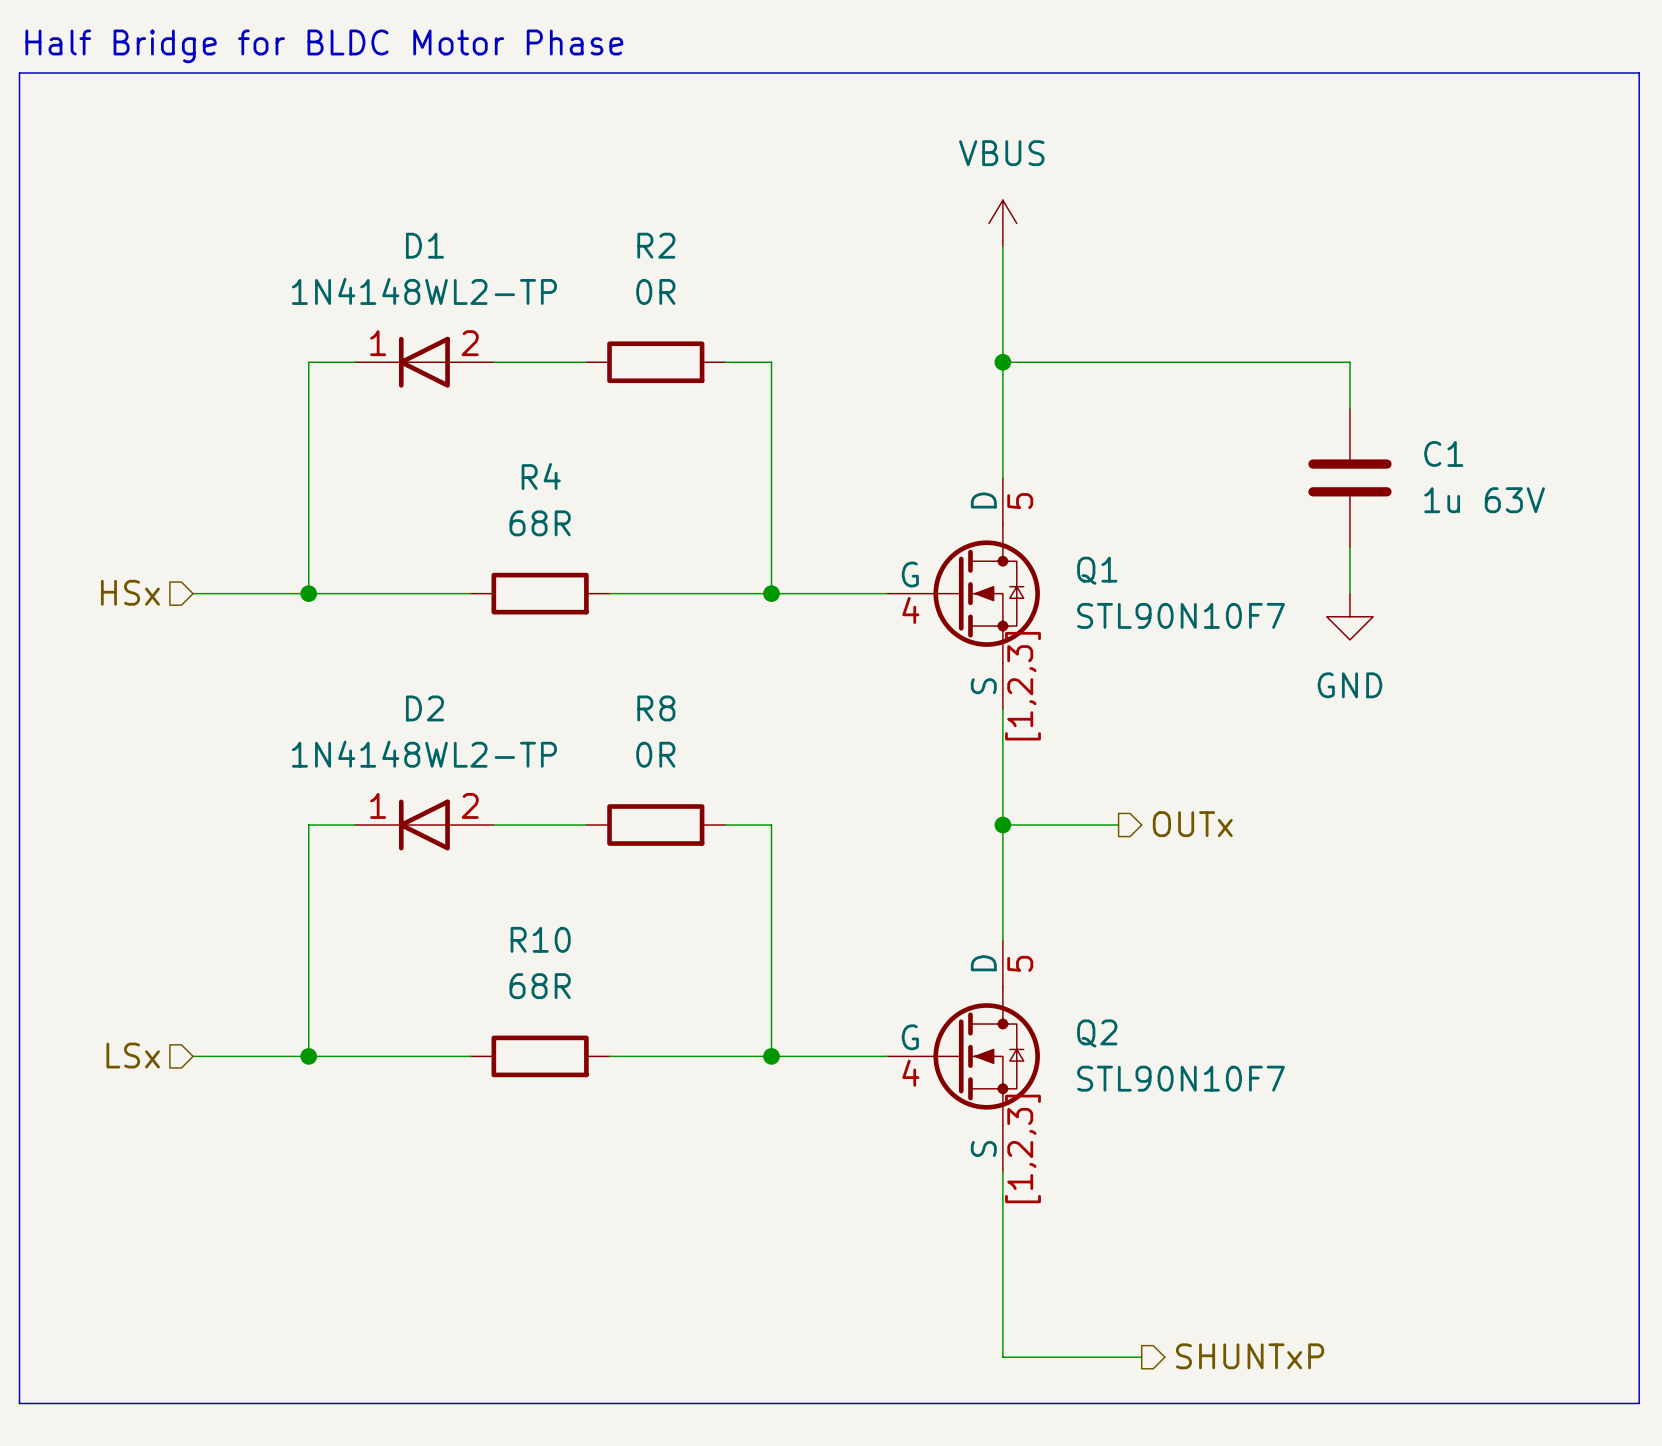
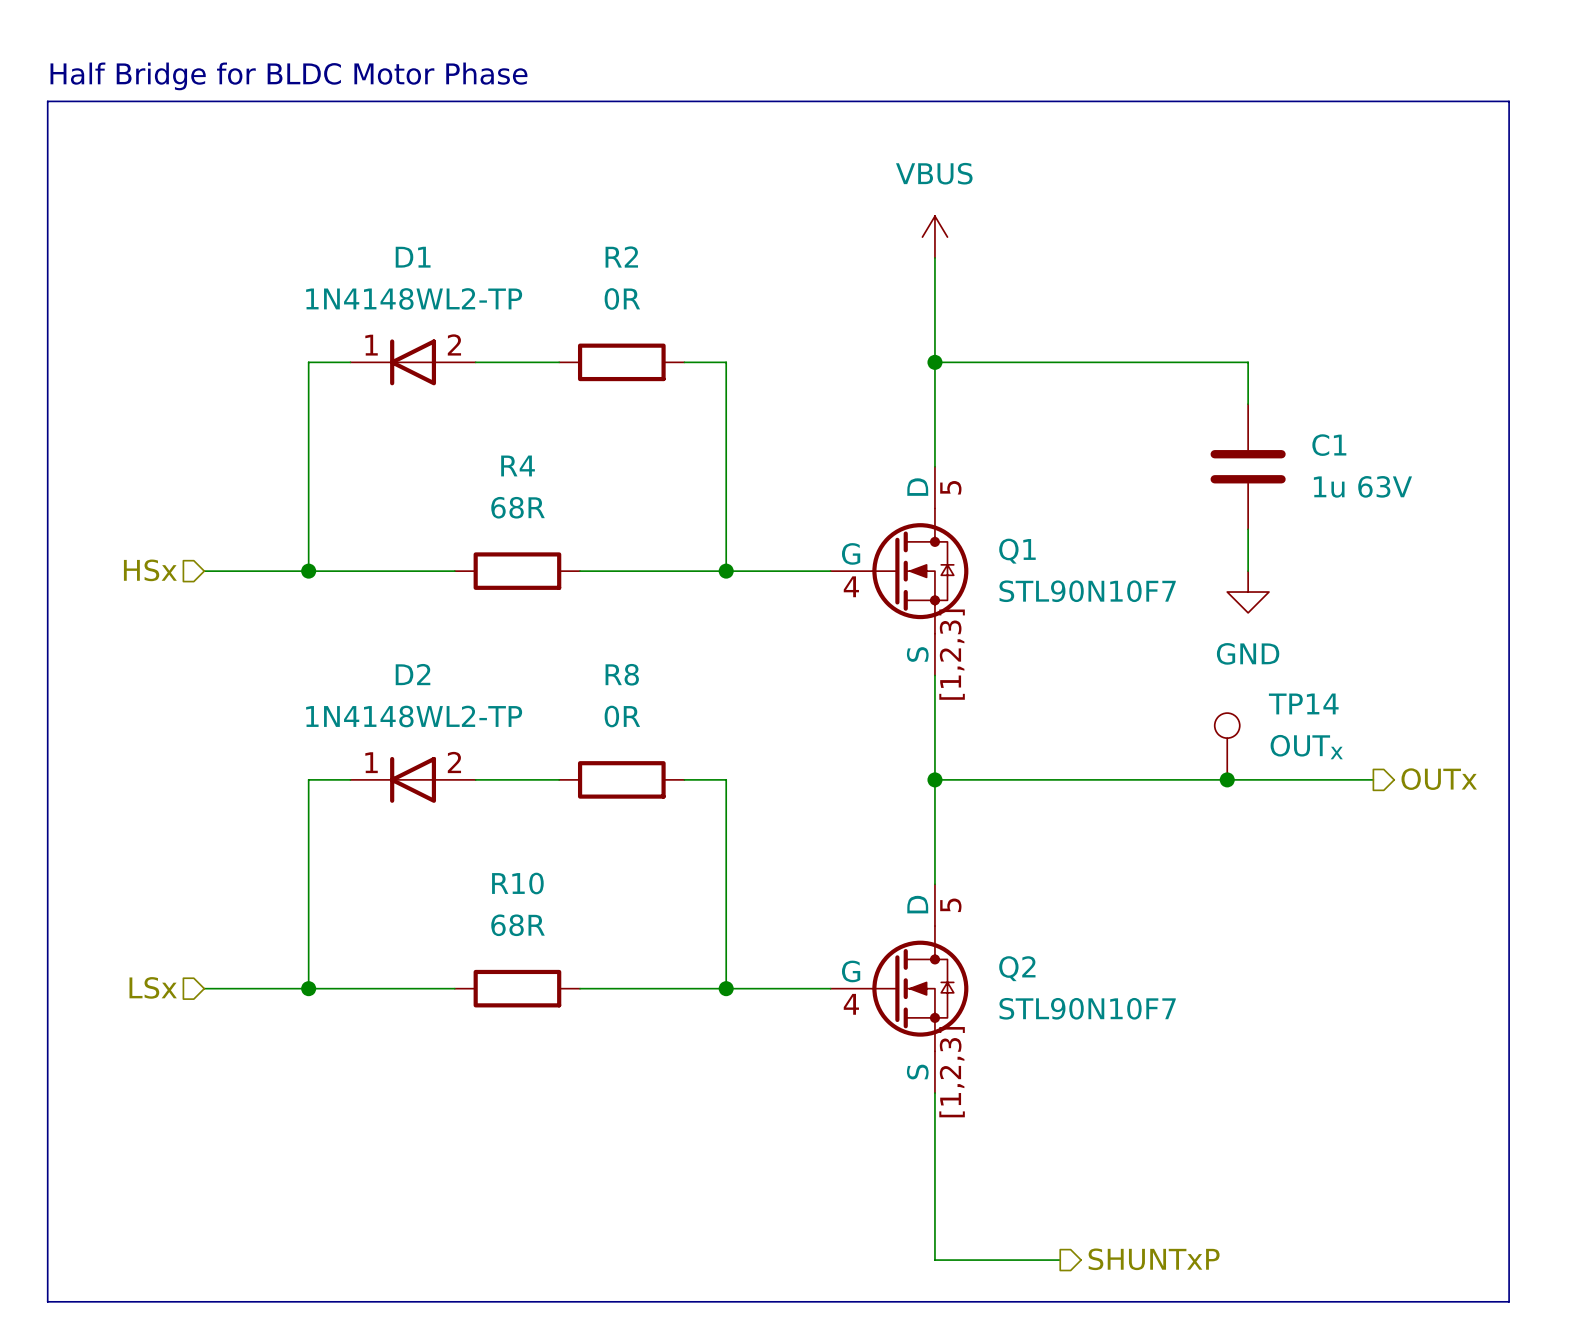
TP14: none -> OUTx (1227, 746)
hierarchical label position: OUTx (1192, 824) -> OUTx (1439, 779)
wire: none -> (1039, 779) (1373, 779)
junction: none -> (1227, 779)

